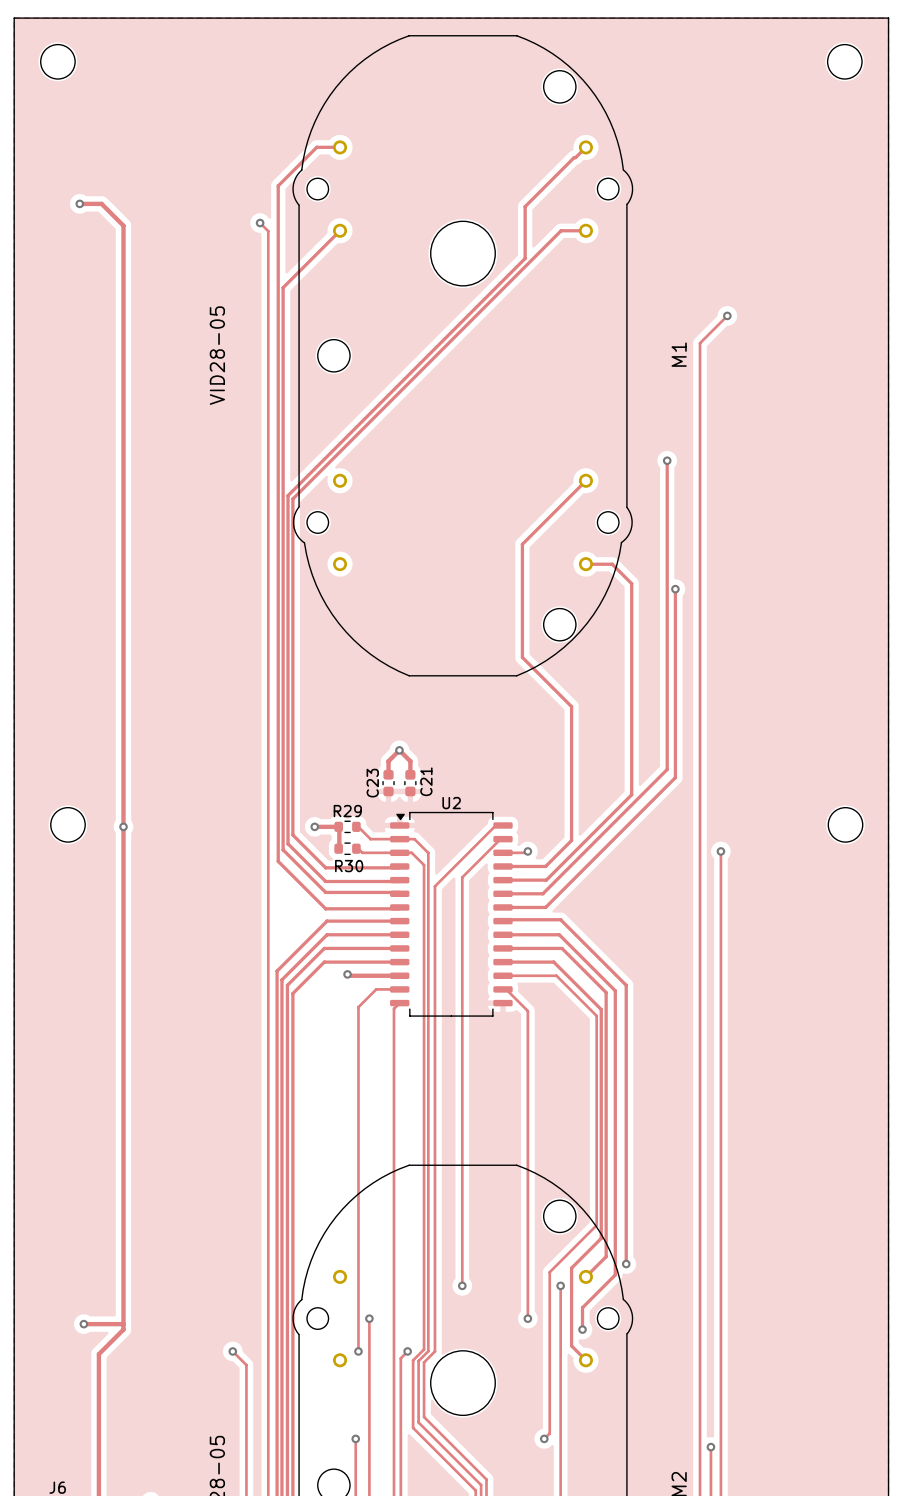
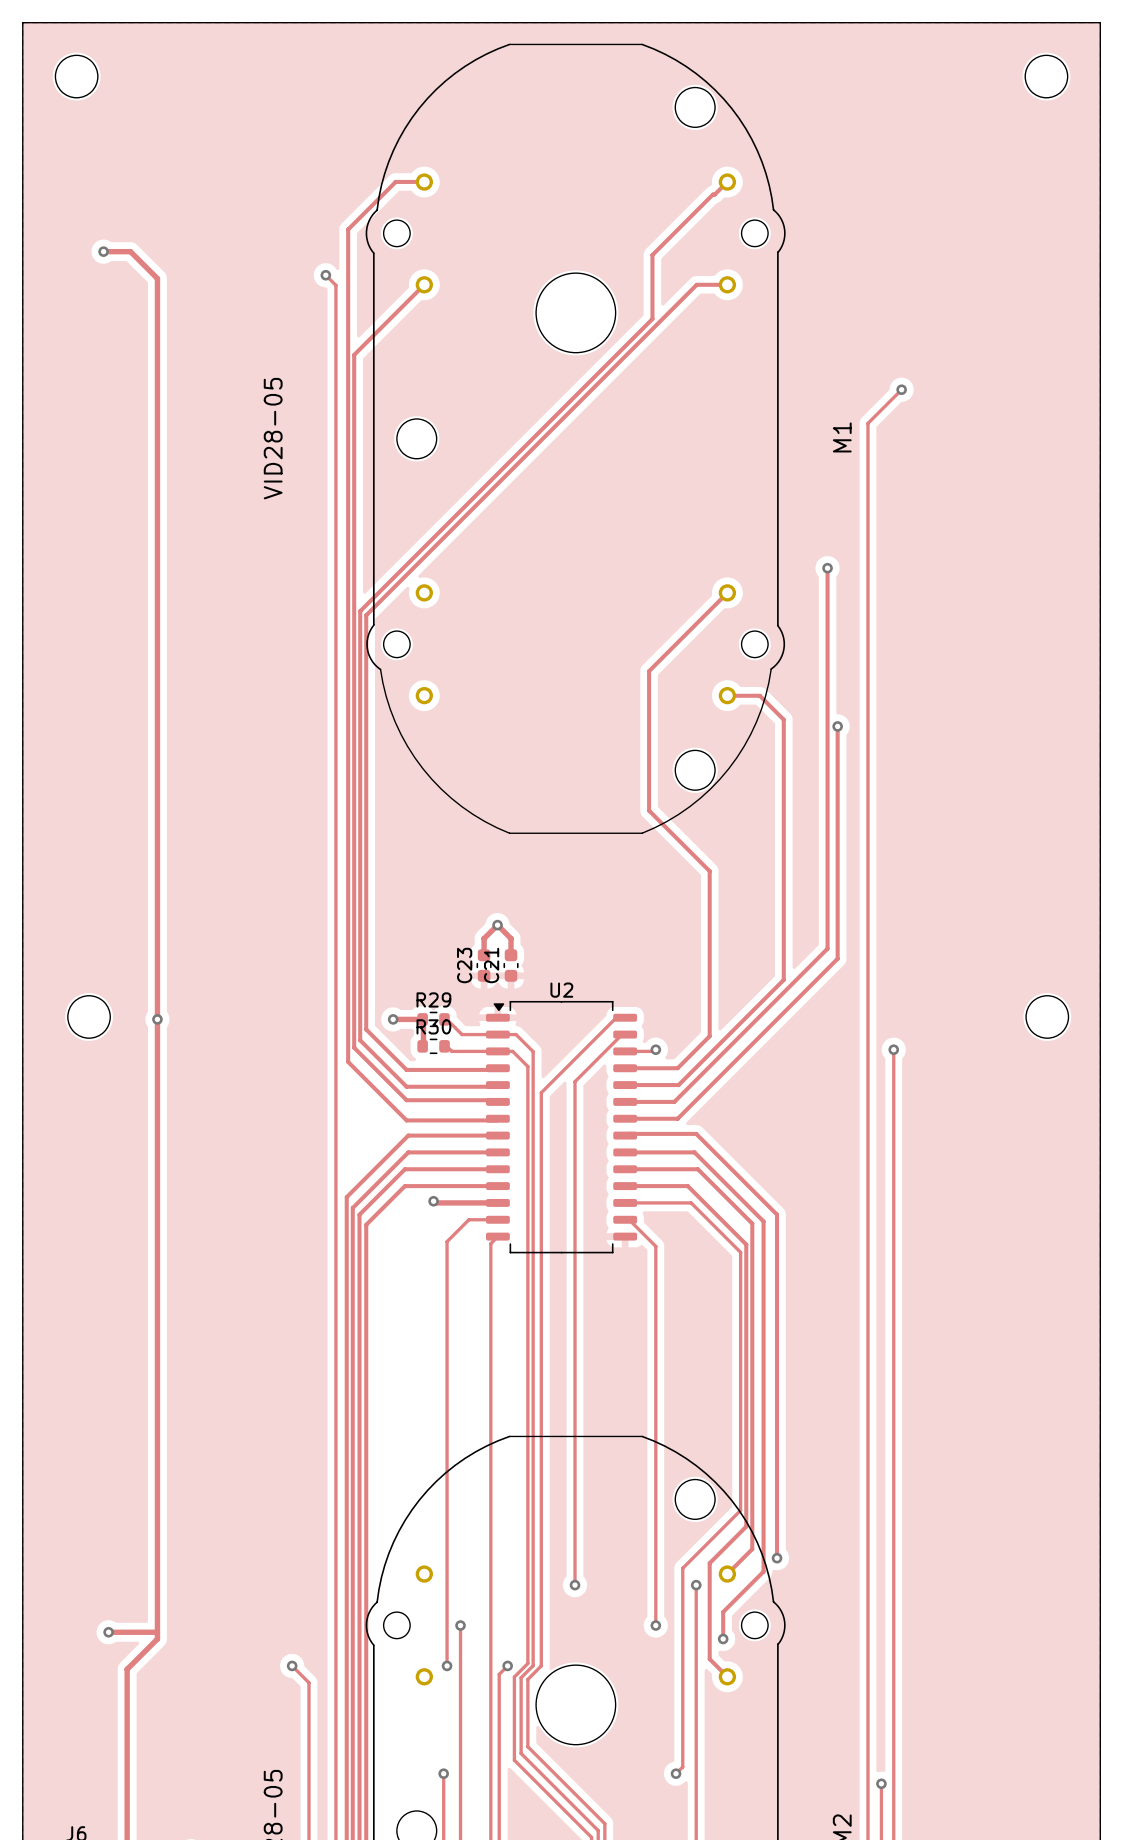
C21 name position: C21 (426, 781) -> C21 (491, 965)
R30 name position: R30 (349, 866) -> R30 (433, 1026)

